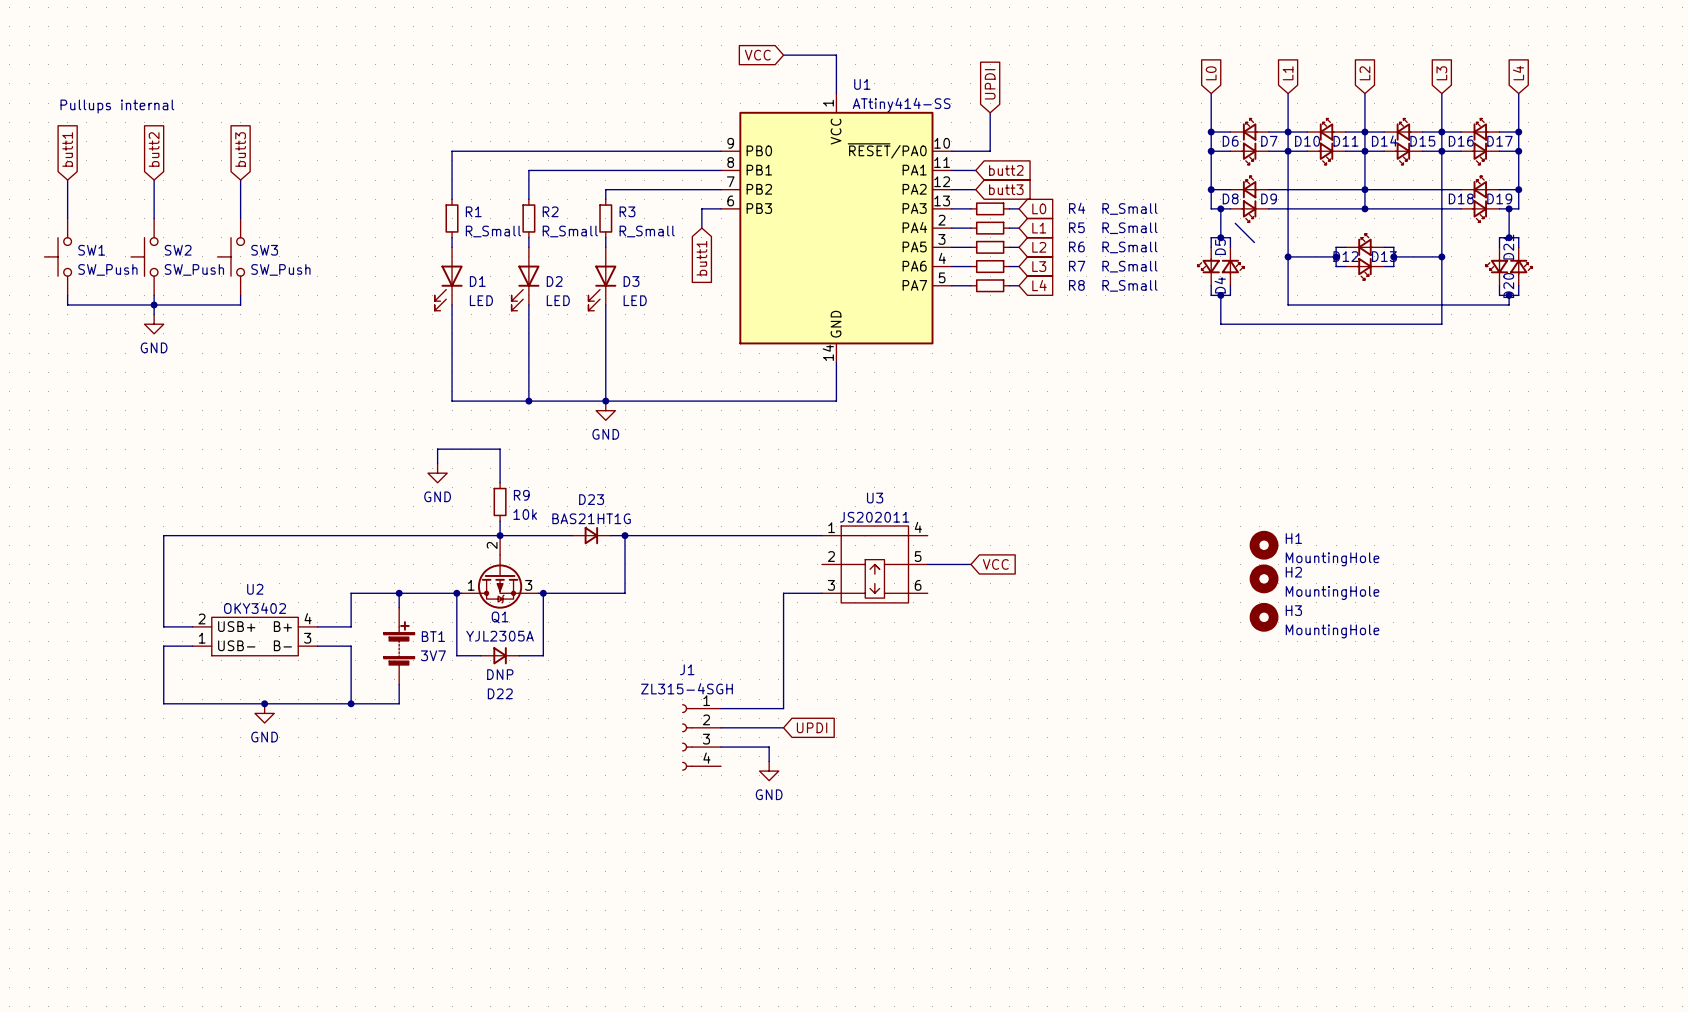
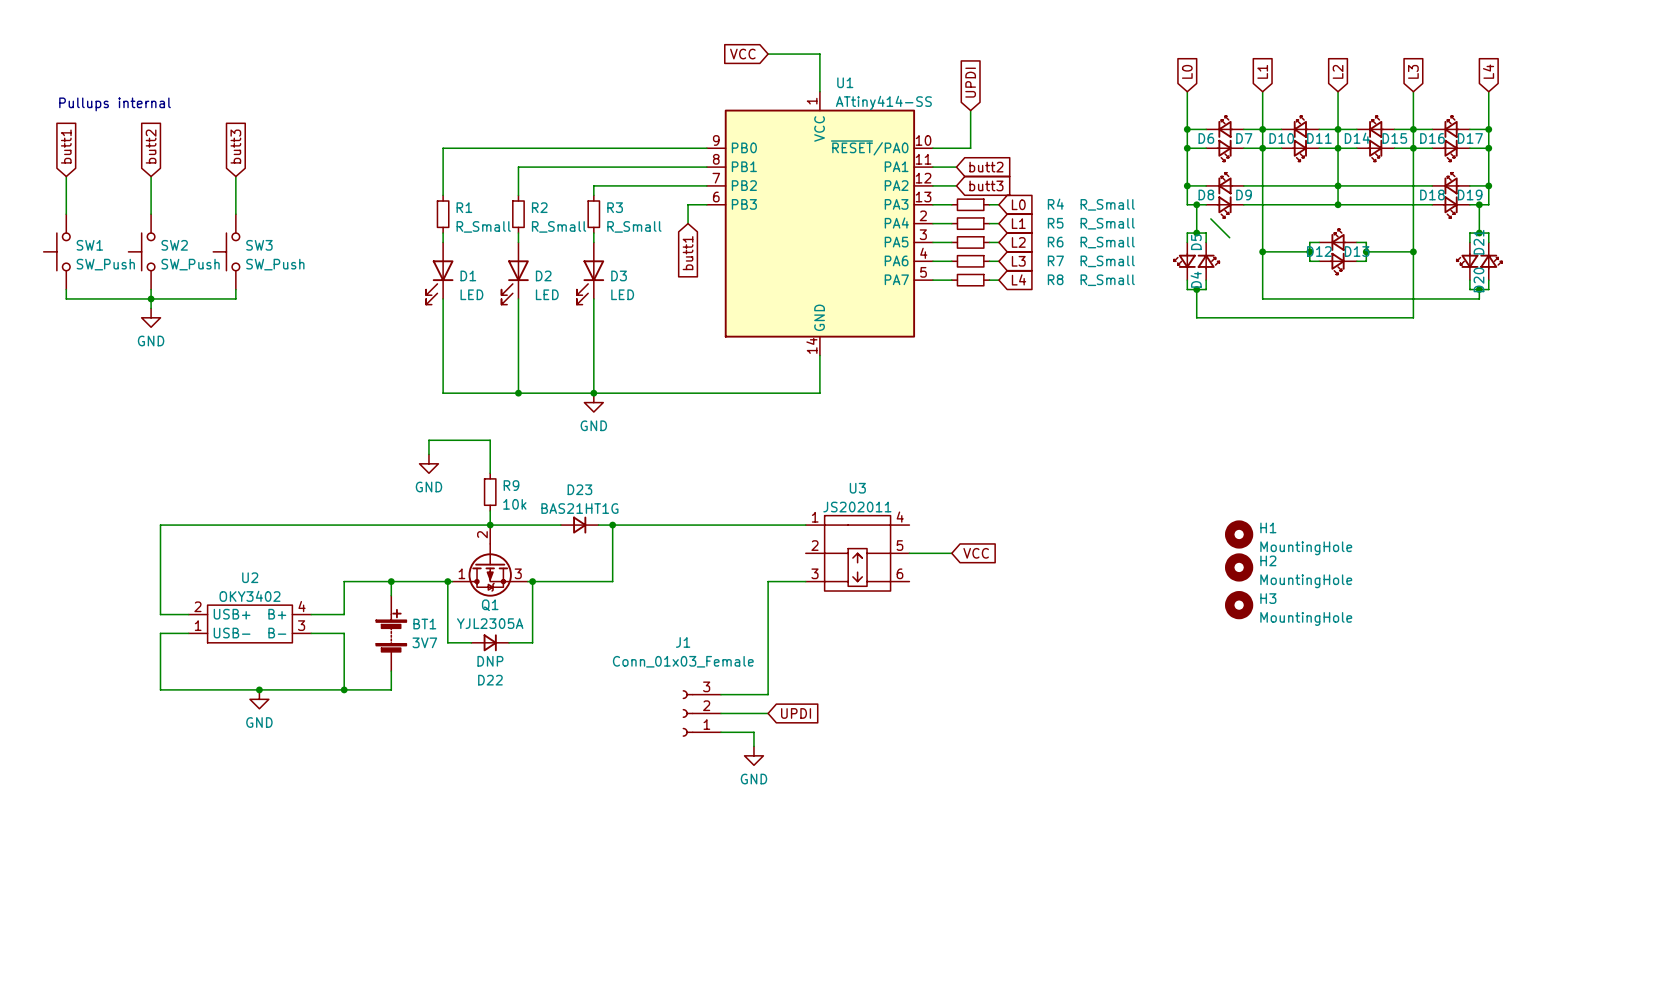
J1 value: ZL315-4SGH (687, 688) -> Conn_01x03_Female (683, 661)
J1 symbol: [682, 704, 722, 771] -> [682, 690, 722, 737]

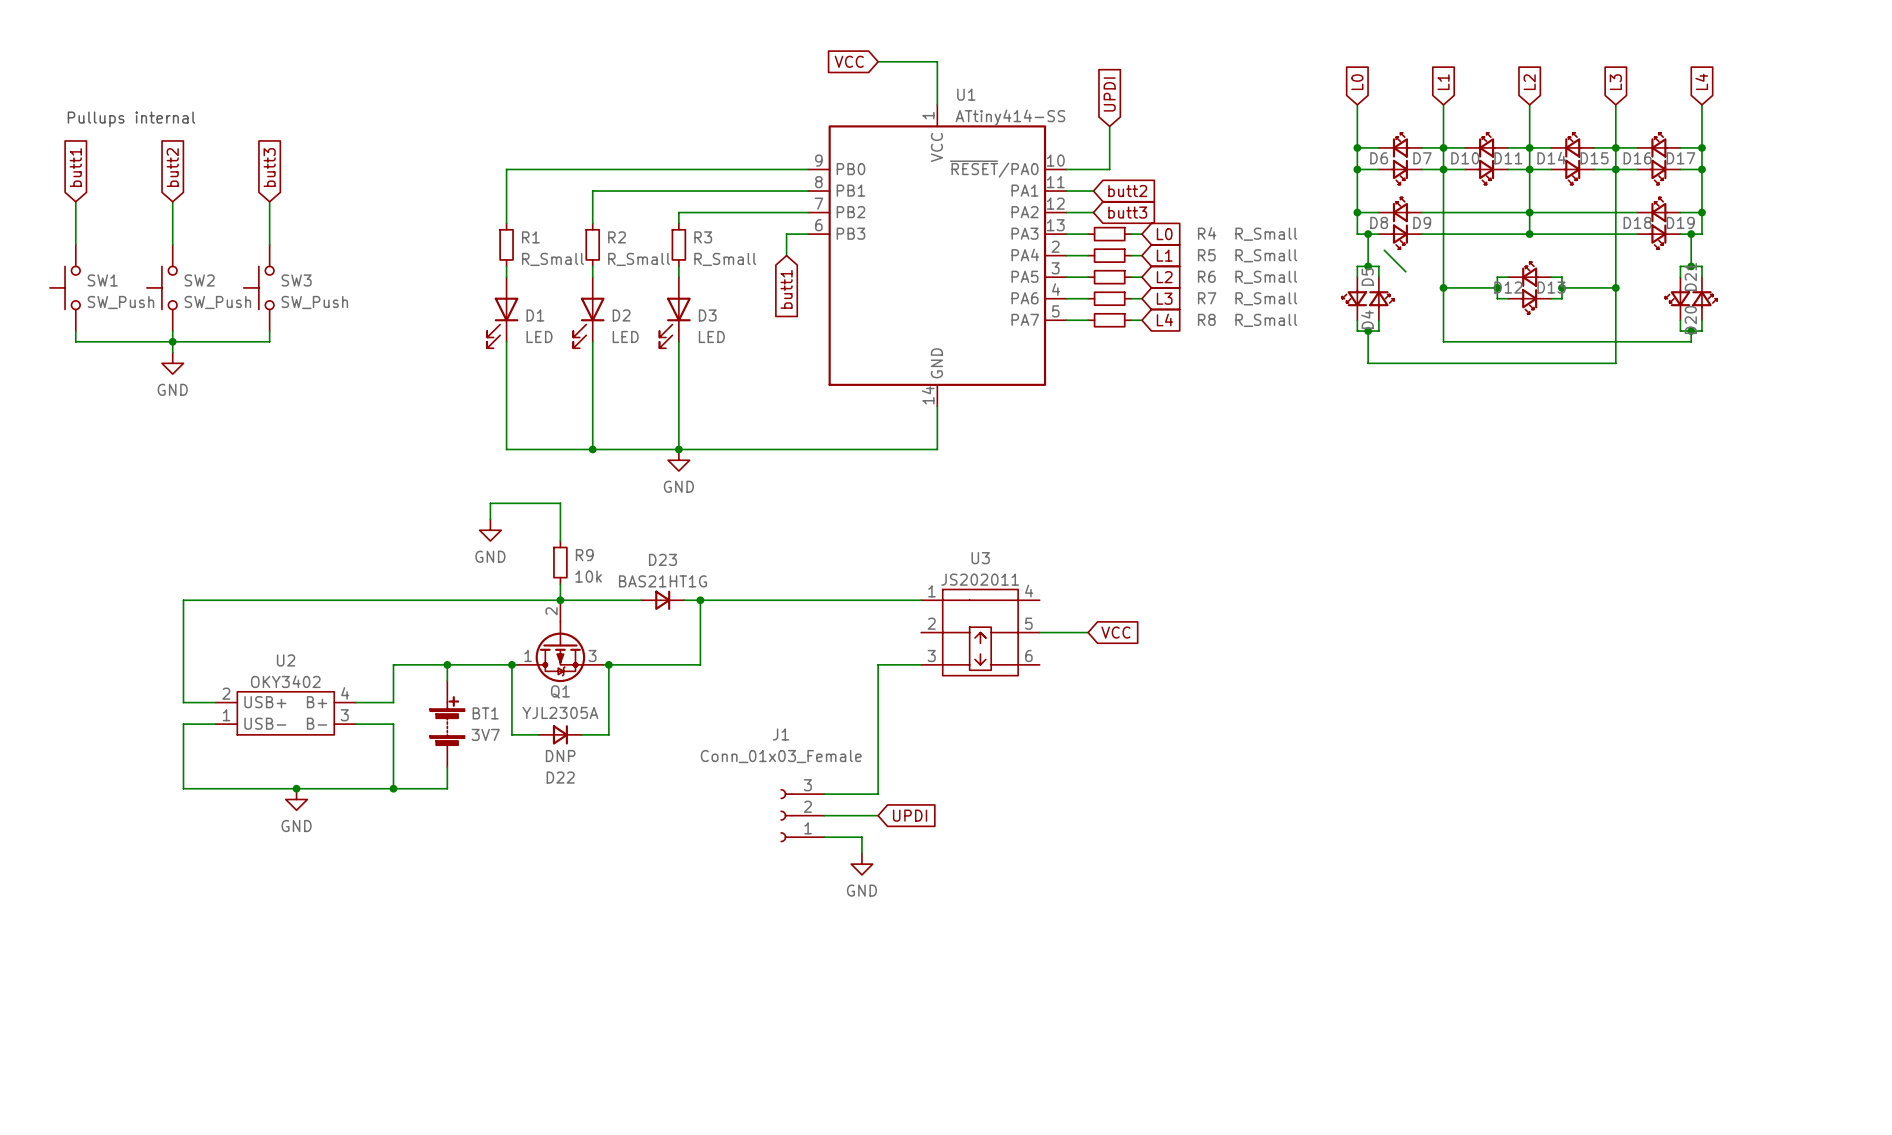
H1: MountingHole (1239, 534) -> none
H2: MountingHole (1239, 567) -> none
H3: MountingHole (1239, 605) -> none

